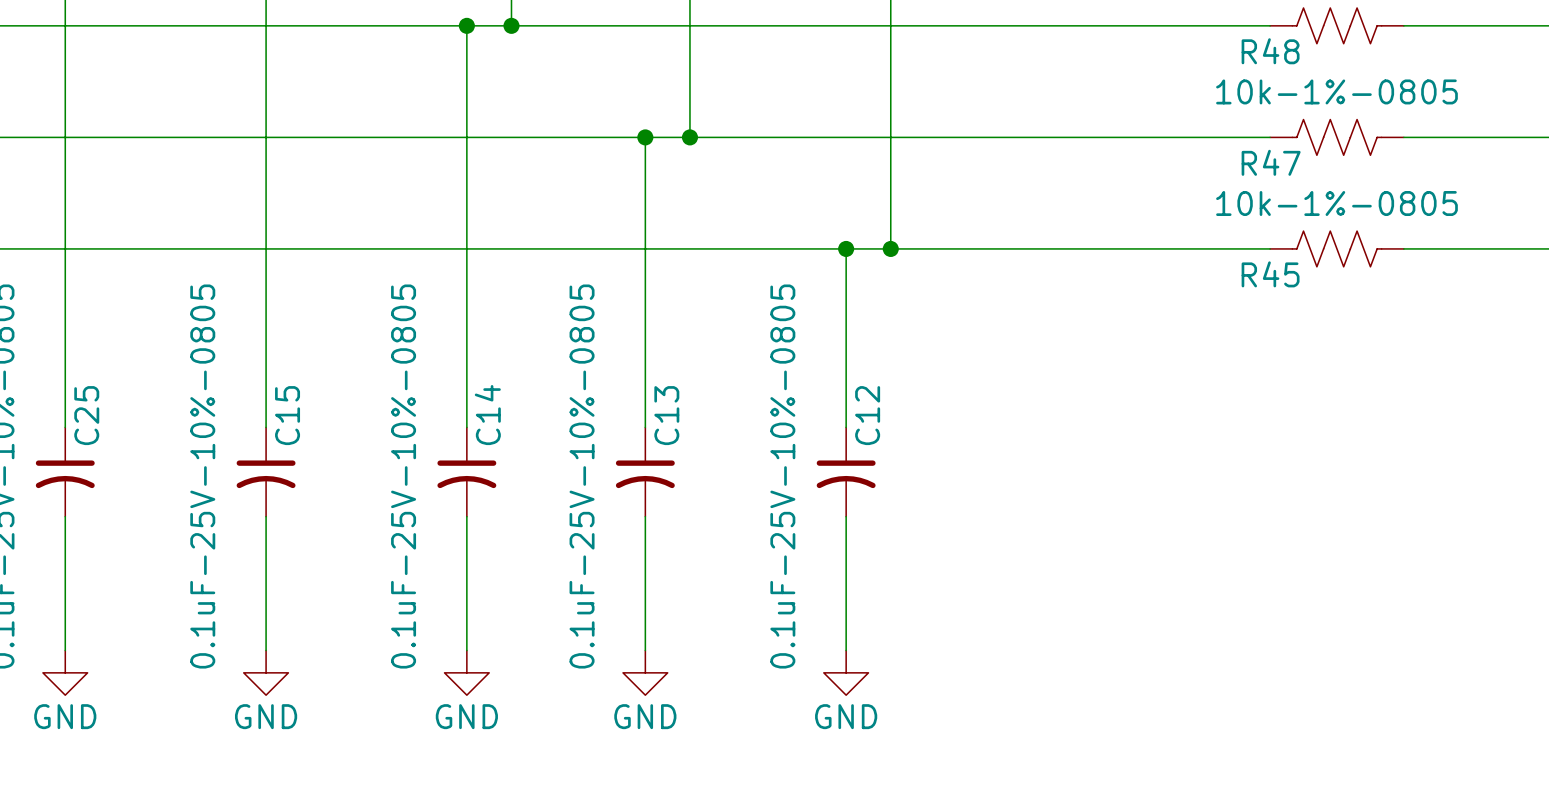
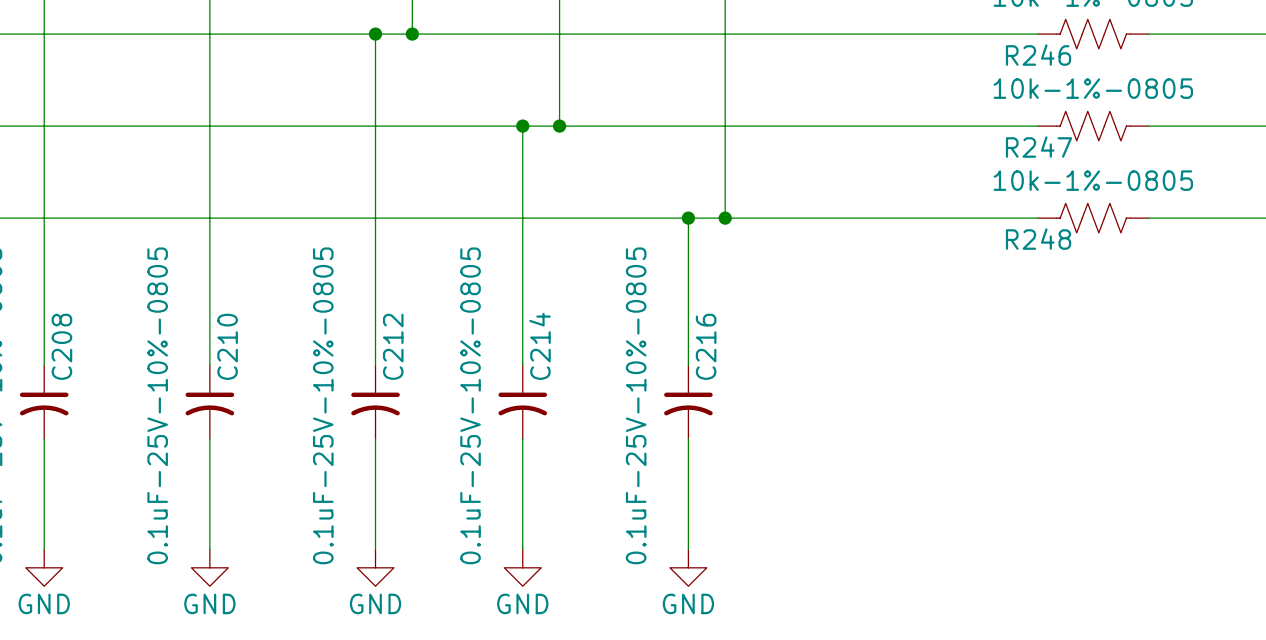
R48 name: R48 (1270, 51) -> R246 (1038, 55)
R47 name: R47 (1271, 162) -> R247 (1038, 147)
R45 name: R45 (1270, 274) -> R248 (1038, 239)
C25 name: C25 (86, 415) -> C208 (61, 346)
C15 name: C15 (287, 415) -> C210 (227, 346)
C14 name: C14 (487, 415) -> C212 (393, 346)
C13 name: C13 (666, 415) -> C214 (540, 346)
C12 name: C12 (867, 415) -> C216 (706, 346)

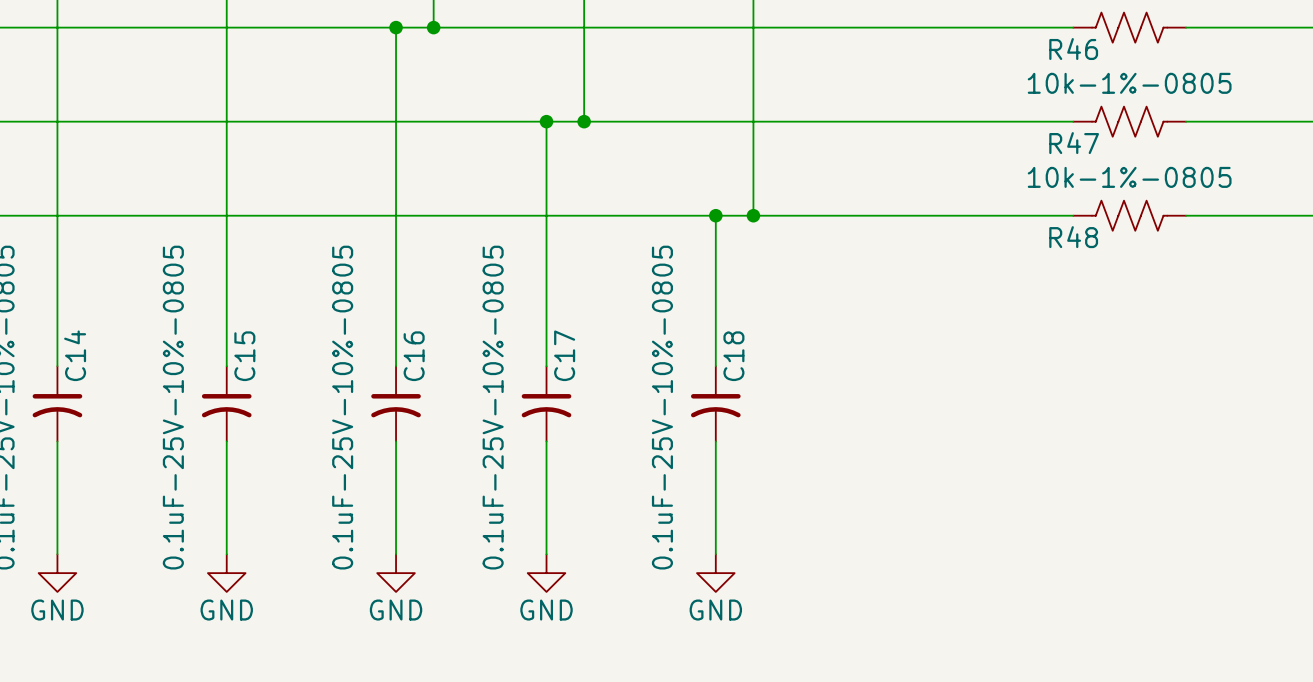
R246 name: R246 (1038, 55) -> R46 (1073, 49)
R247 name: R247 (1038, 147) -> R47 (1074, 143)
R248 name: R248 (1038, 239) -> R48 (1073, 237)
C208 name: C208 (61, 346) -> C14 (75, 355)
C210 name: C210 (227, 346) -> C15 (244, 356)
C212 name: C212 (393, 346) -> C16 (414, 356)
C214 name: C214 (540, 346) -> C17 (564, 355)
C216 name: C216 (706, 346) -> C18 (733, 356)

